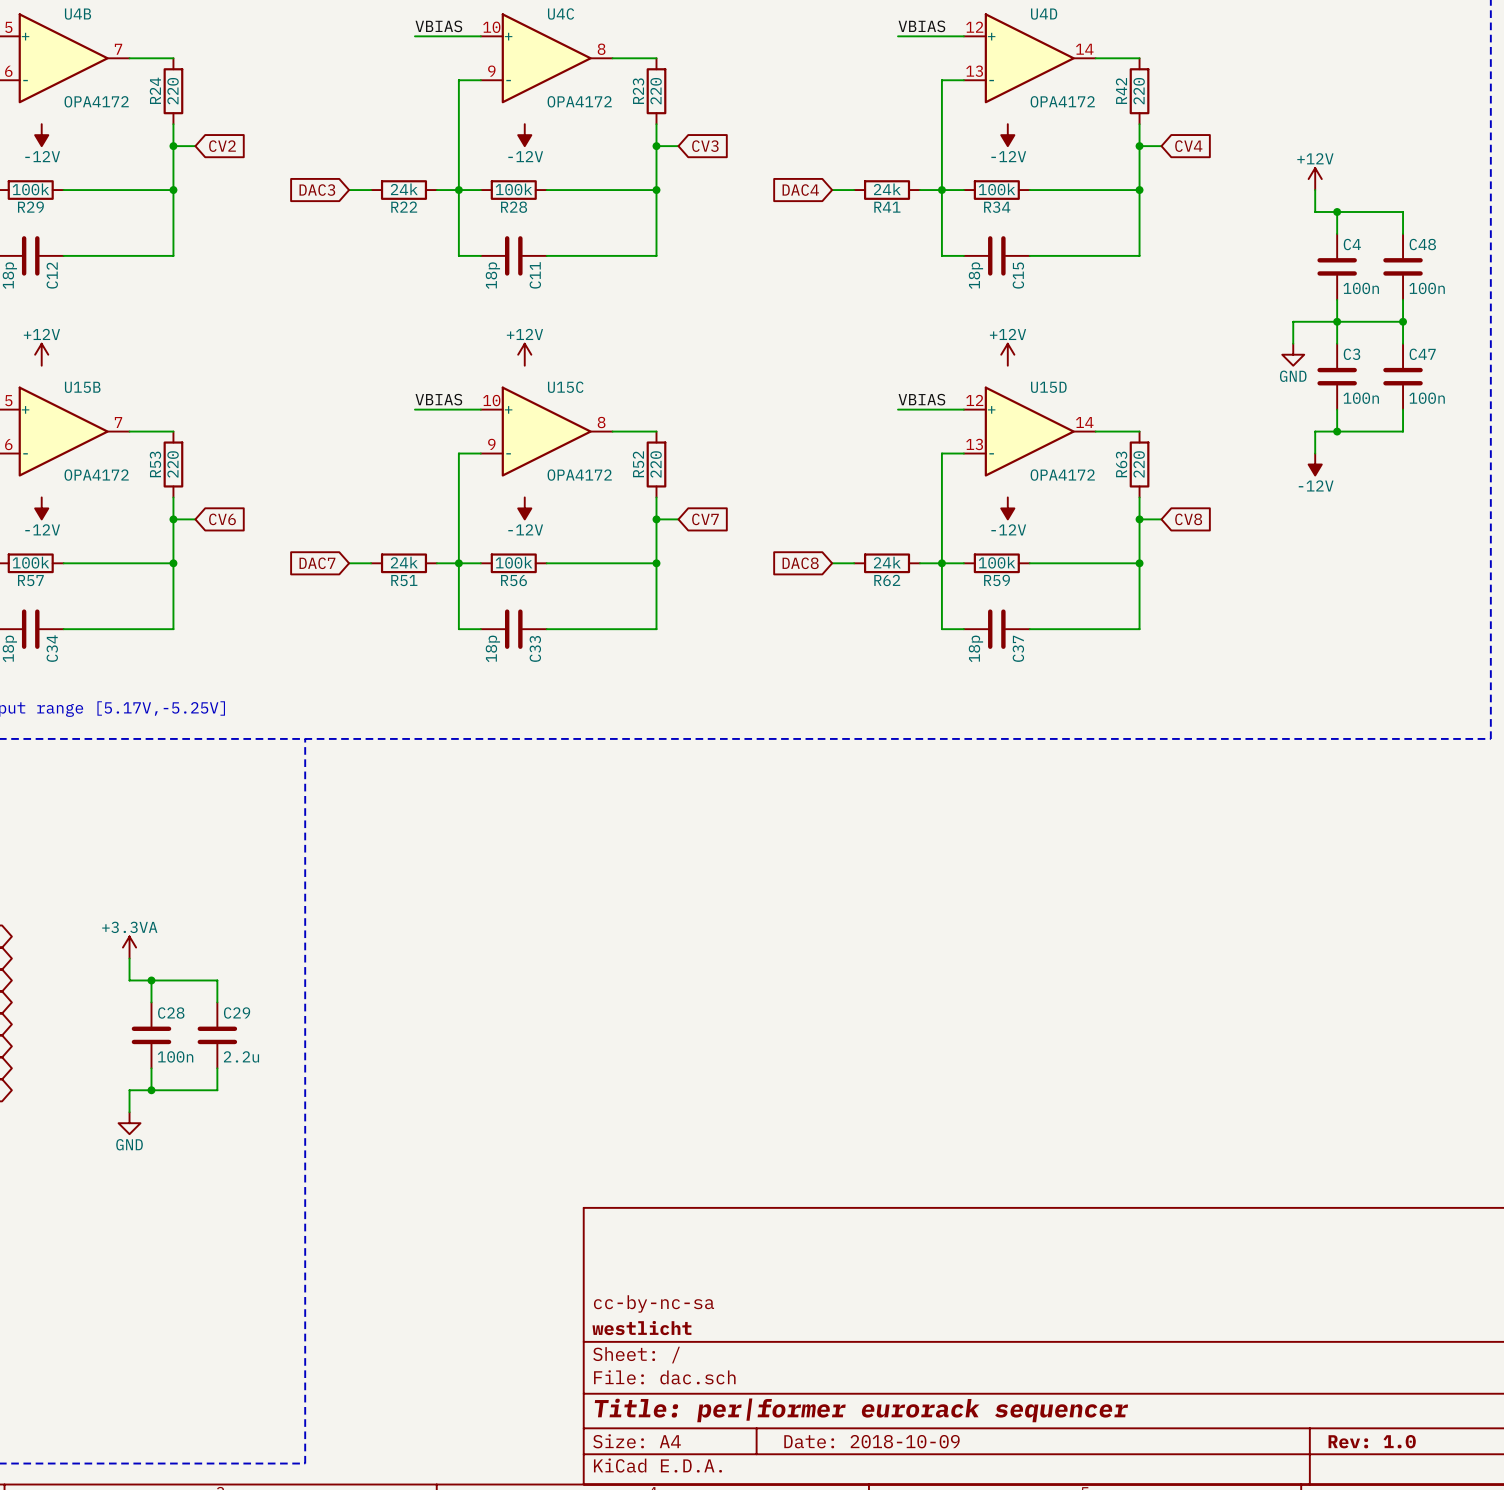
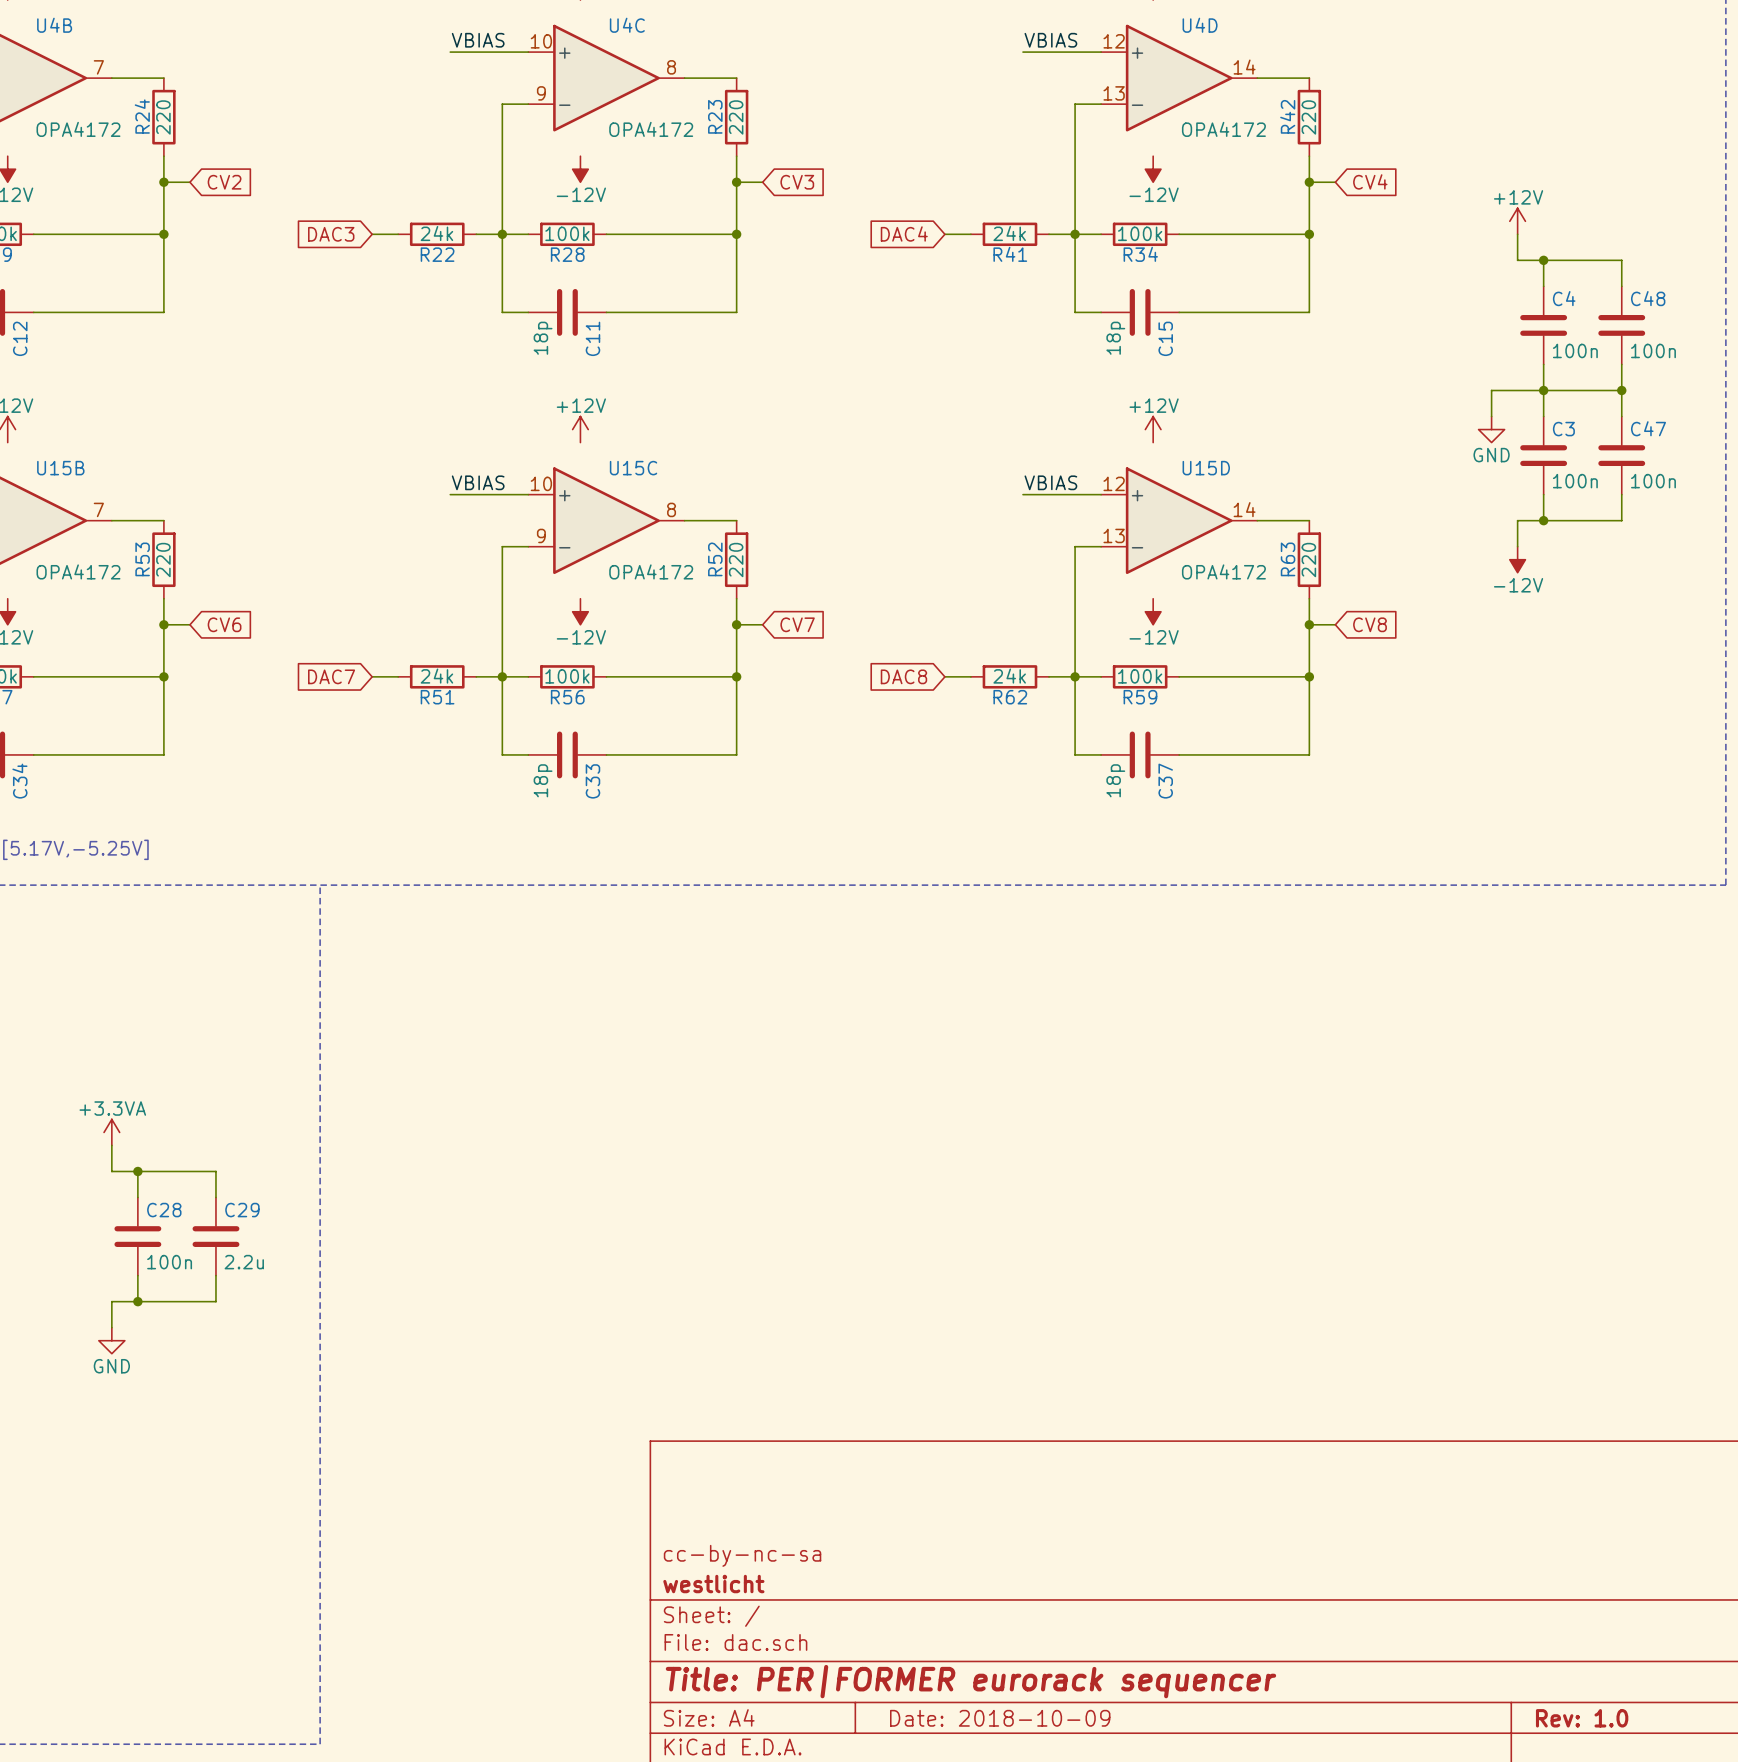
title block: Title: per|former eurorack sequencer (861, 1410) -> Title: PER|FORMER eurorack sequencer (970, 1681)

